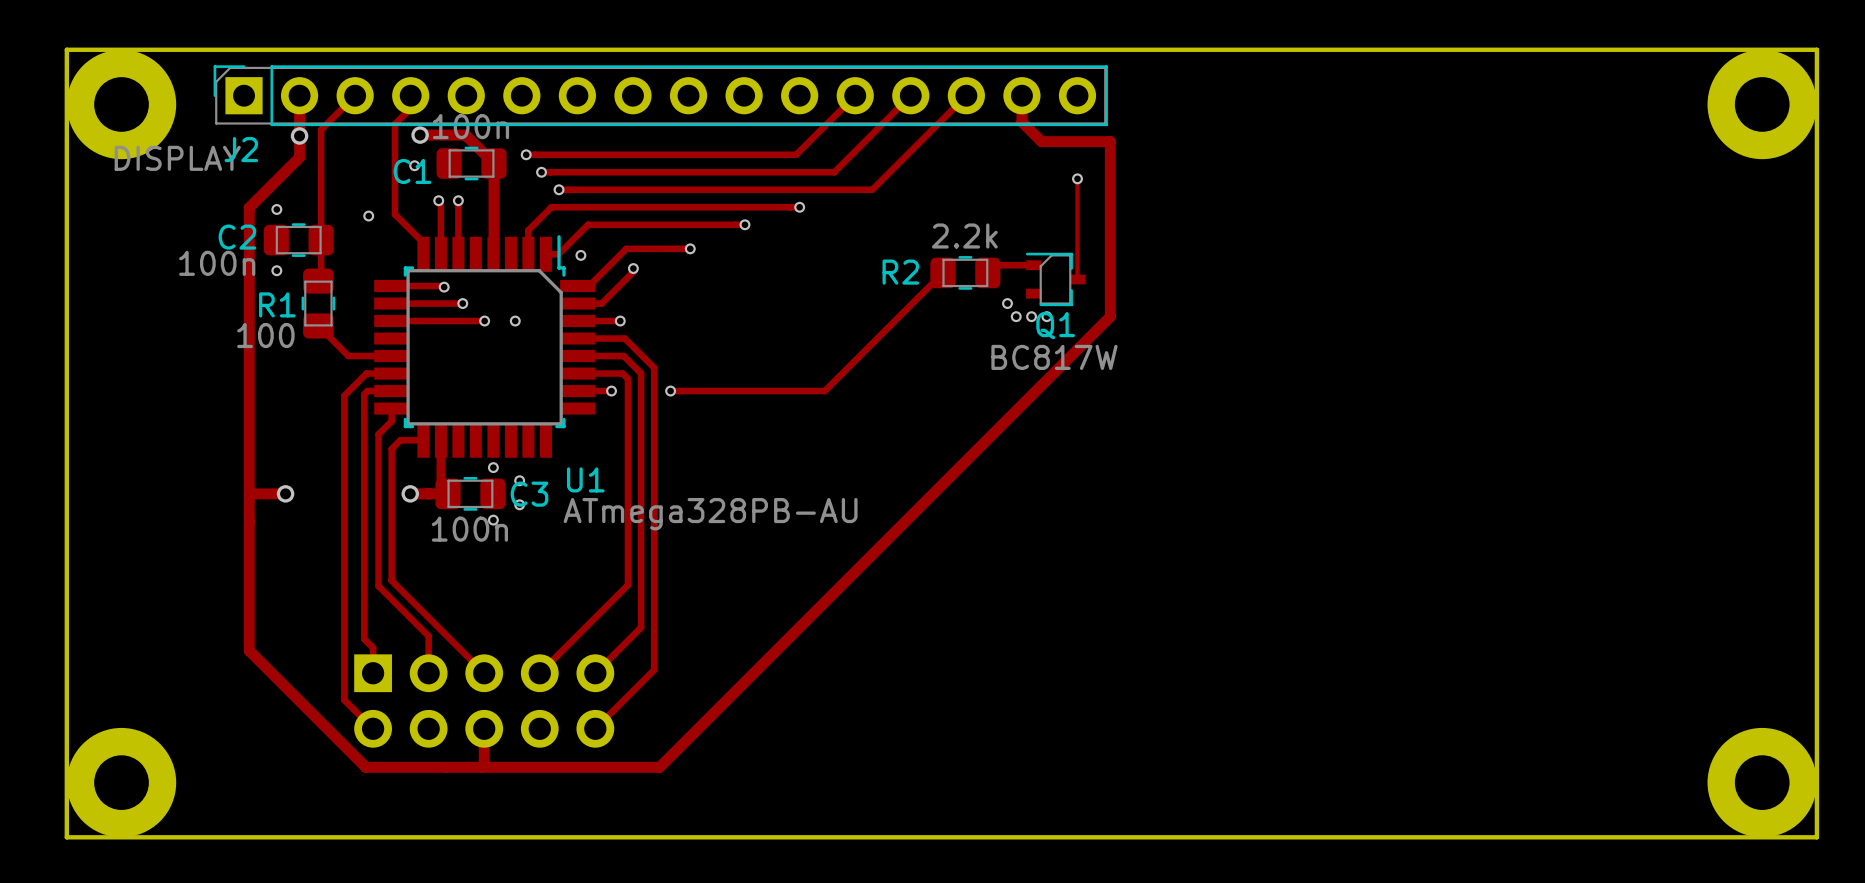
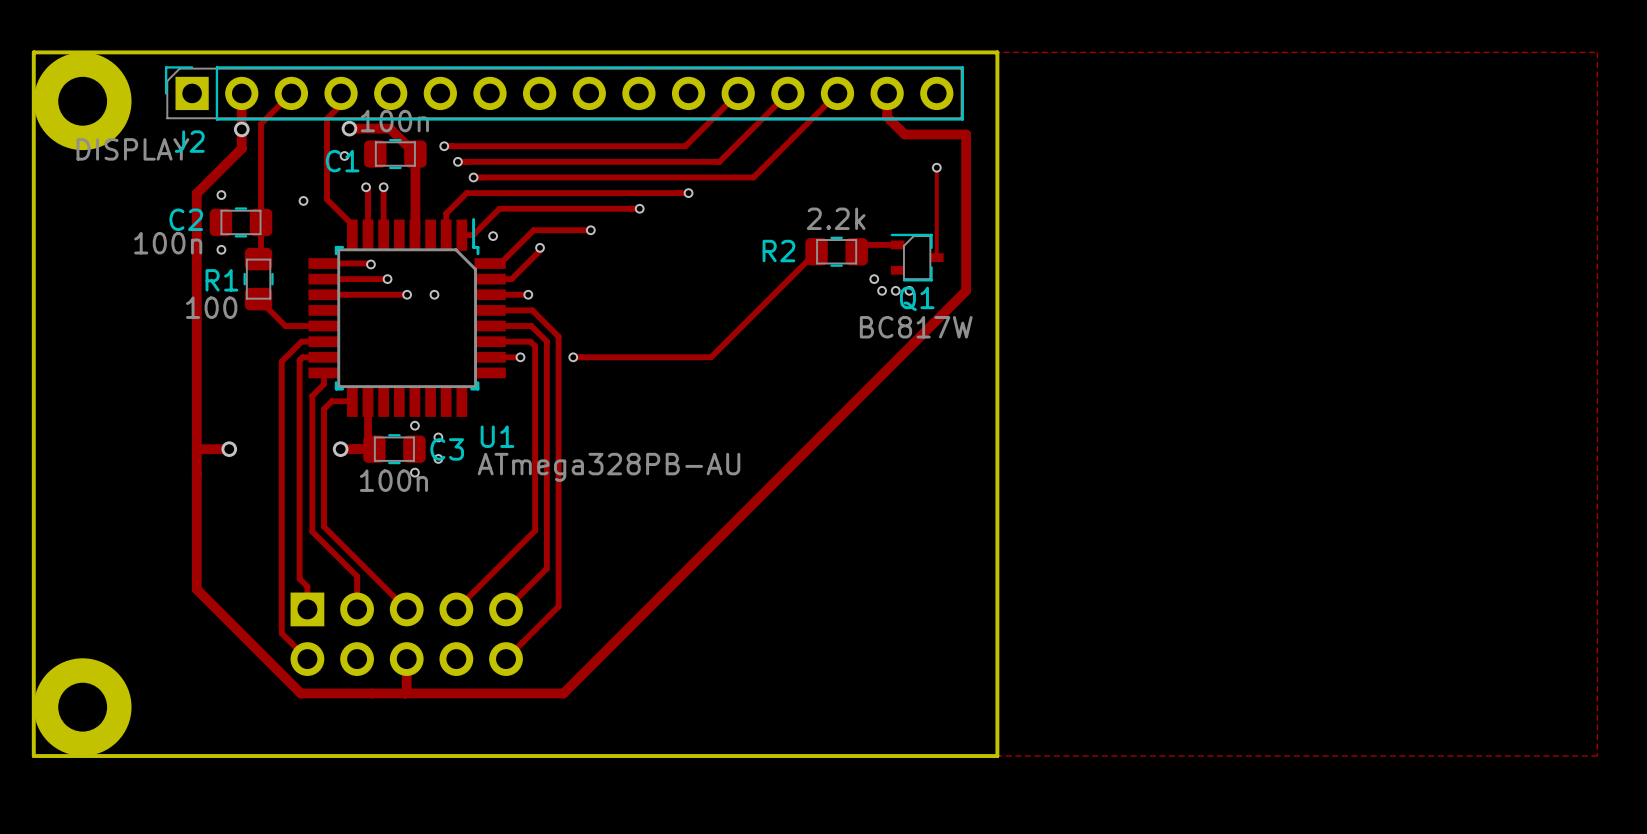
board edge: (1145, 49) (1816, 49) (1816, 837) (1145, 837) -> (997, 52) (997, 756)
part: (1762, 104) -> none
part: (1762, 782) -> none

